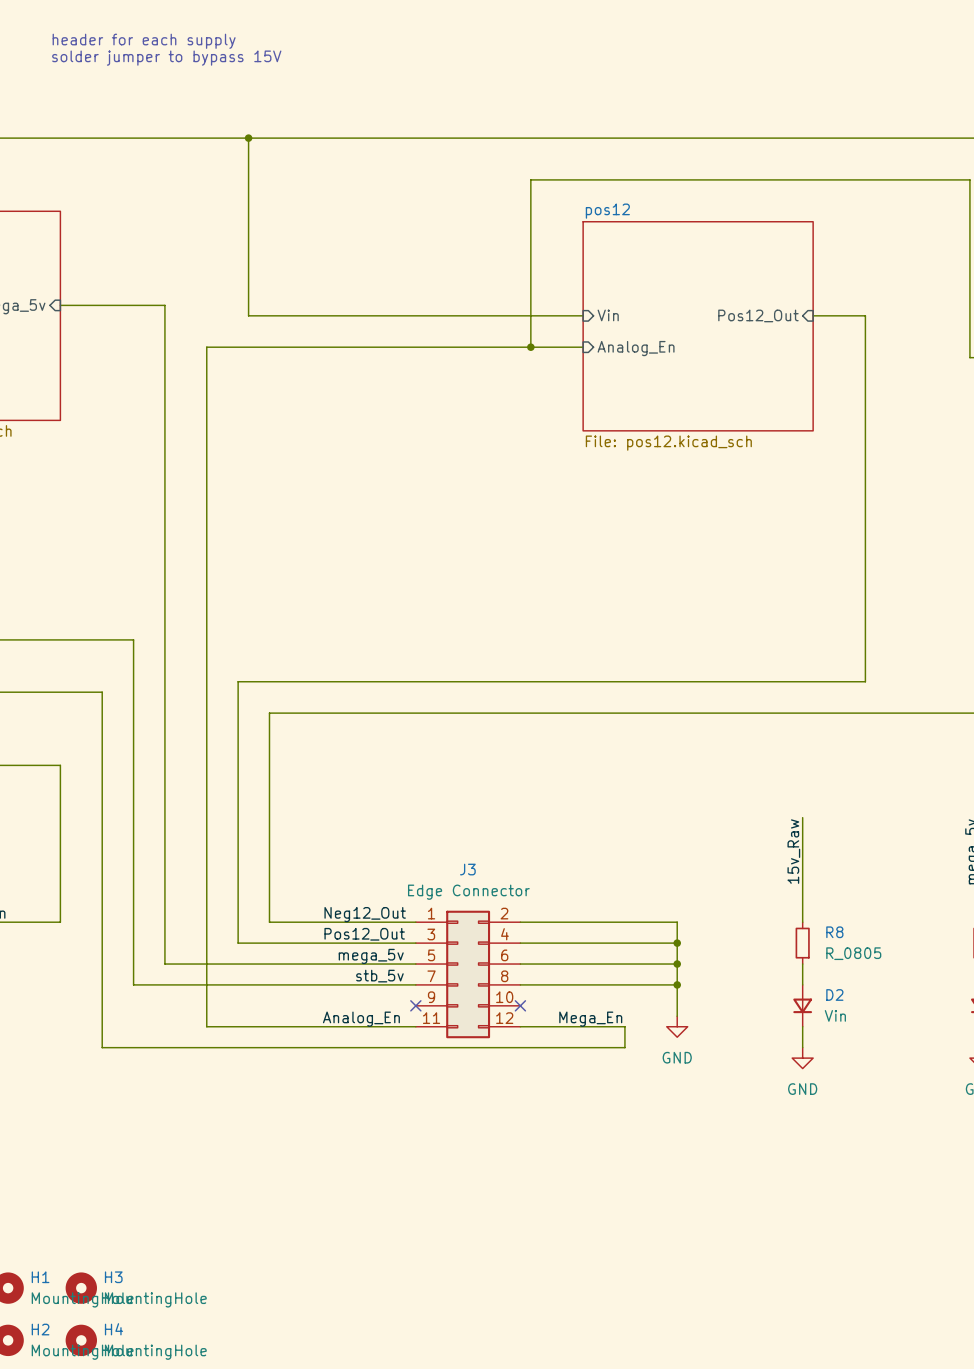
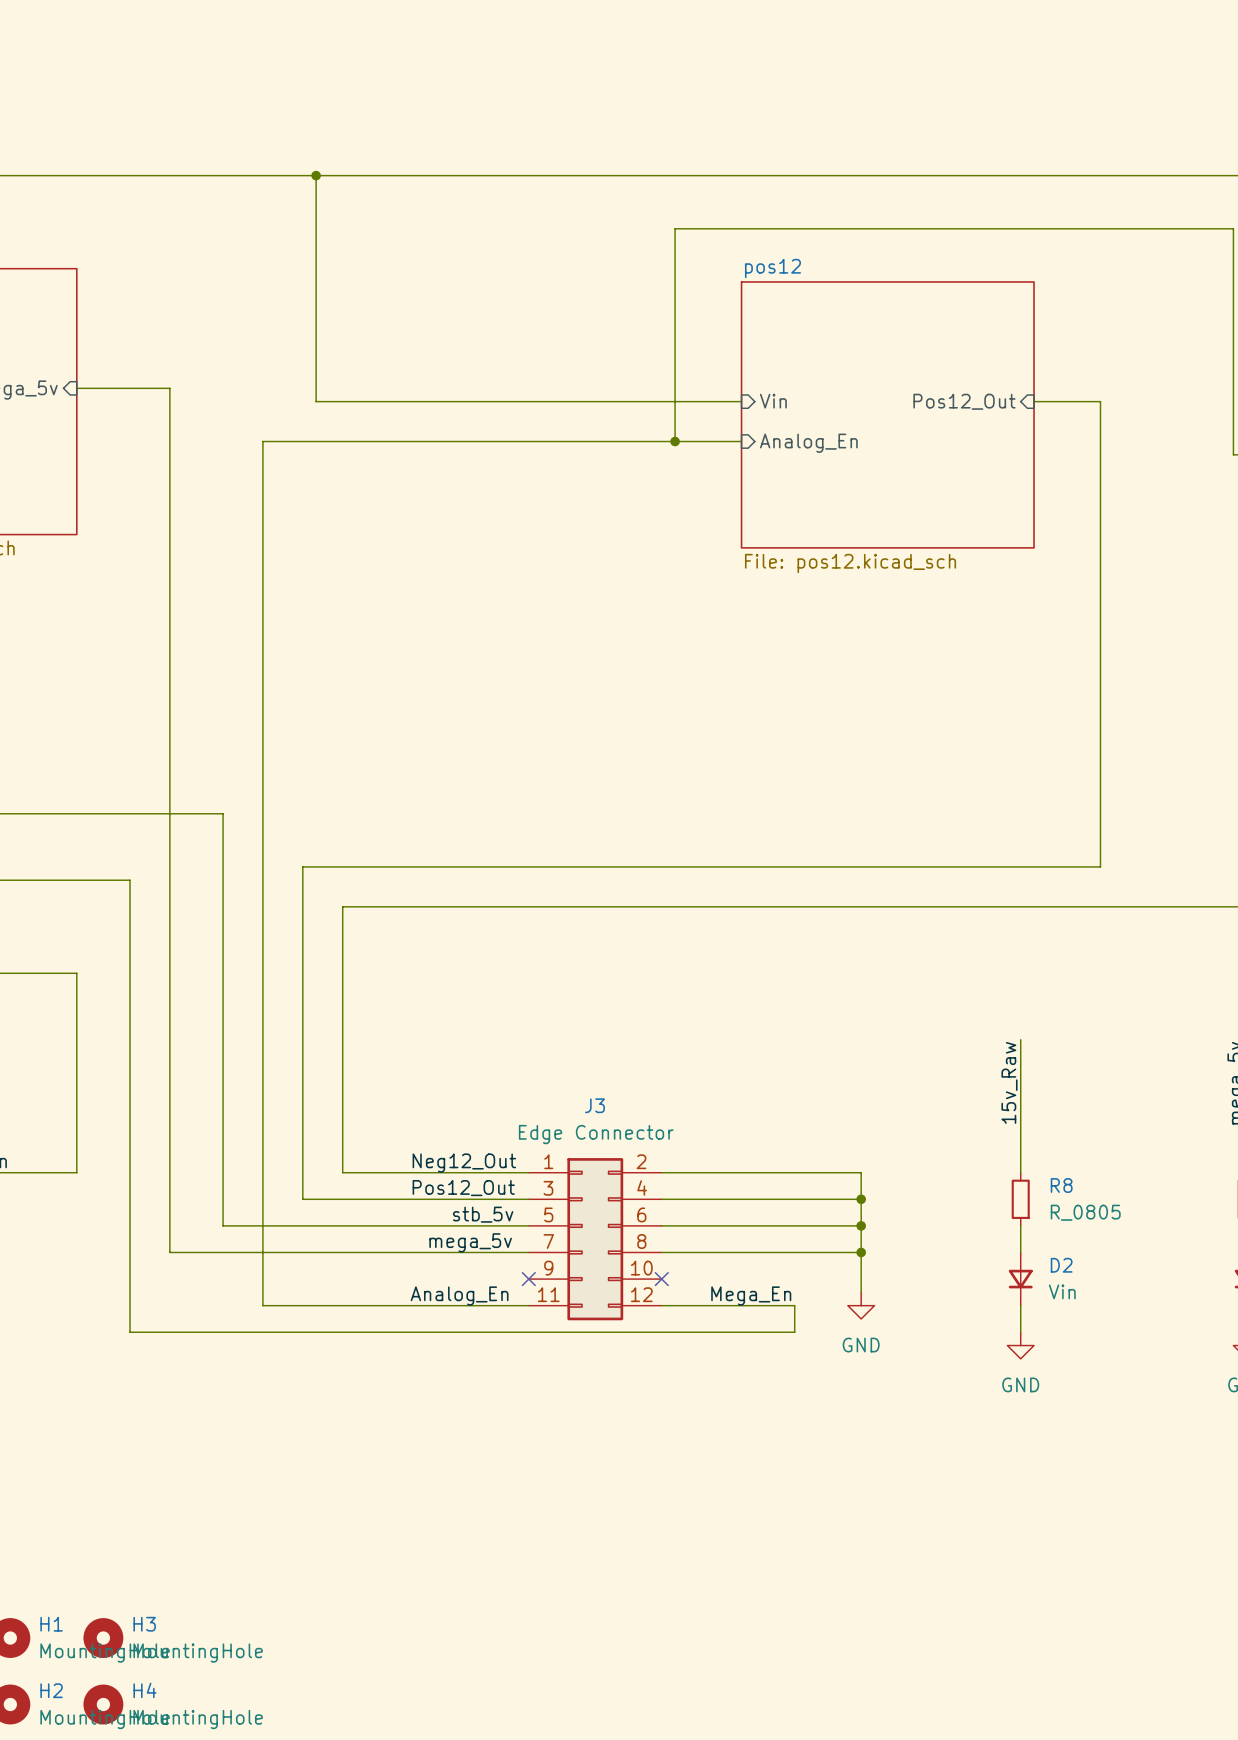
text: header for each supply (144, 41) -> none
text: solder jumper to bypass 15V (166, 58) -> none
wire: (133, 305) (164, 305) (164, 964) (175, 964) -> (169, 388) (169, 813) (223, 813) (223, 1225)
label: mega_5v (371, 956) -> stb_5v (483, 1214)
label: stb_5v (379, 976) -> mega_5v (470, 1242)

